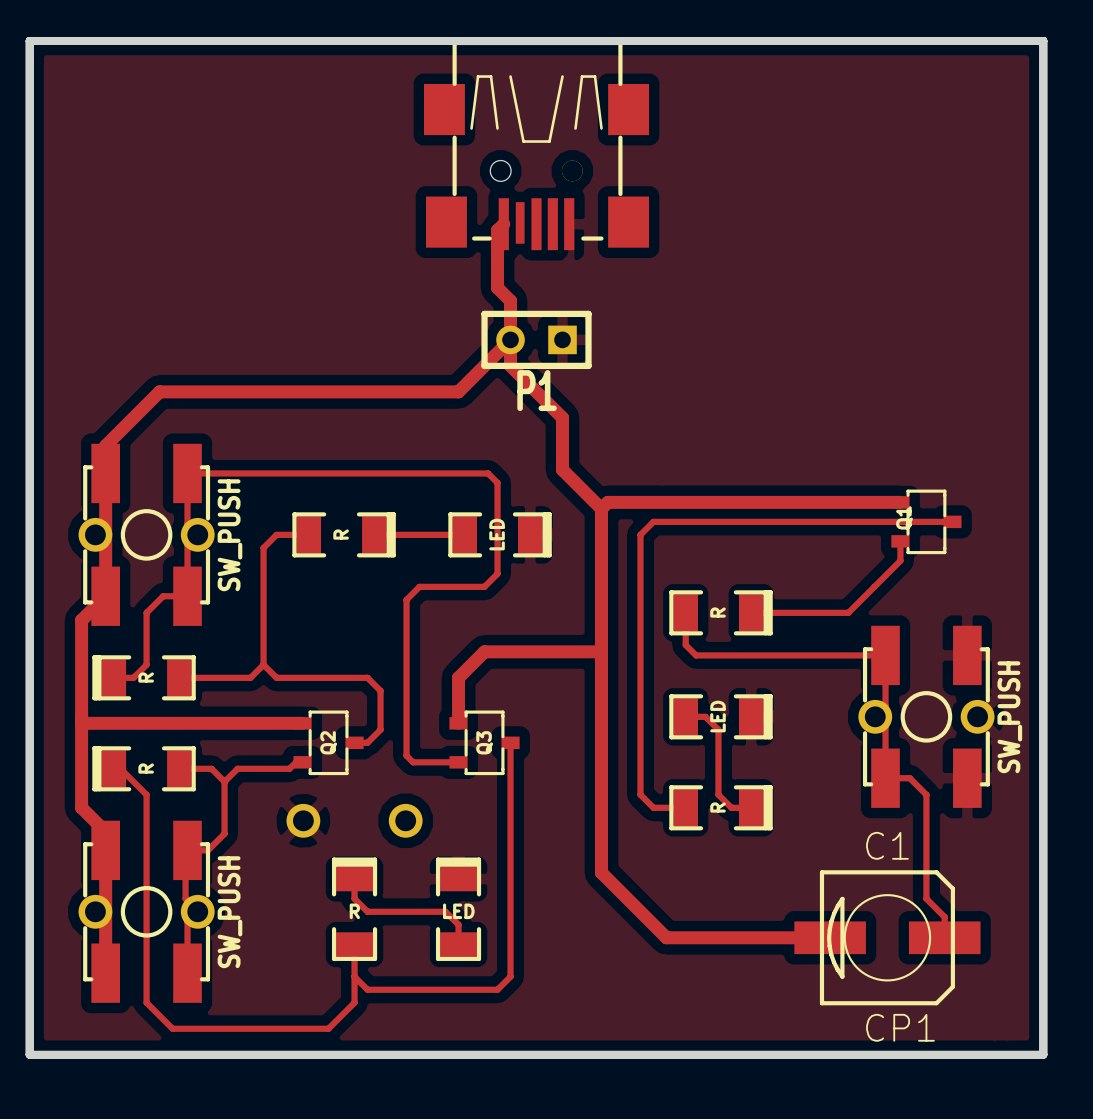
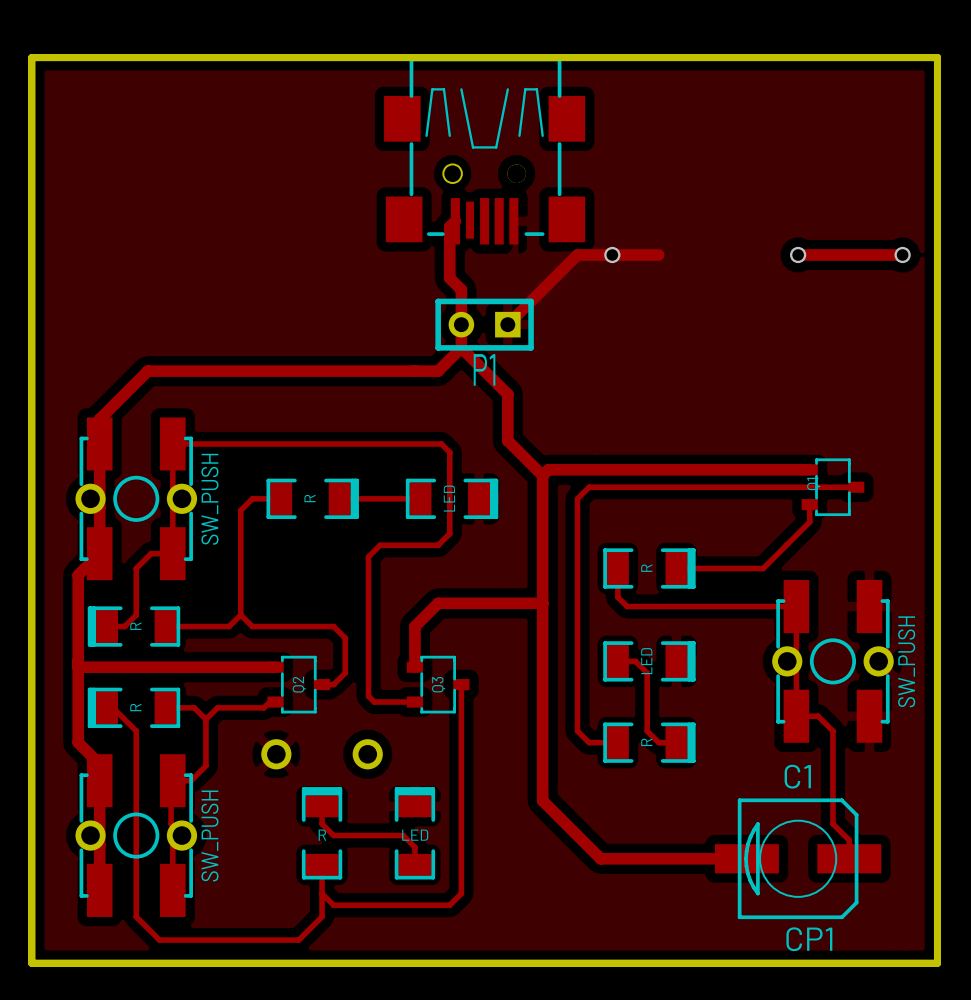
via: none -> (612, 254)
track: none -> (658, 254) (577, 254) (507, 324)
track: none -> (798, 254) (902, 254)
via: none -> (798, 254)
via: none -> (902, 254)
track: (510, 339) (458, 391) -> (461, 347) (438, 371) (414, 371)

